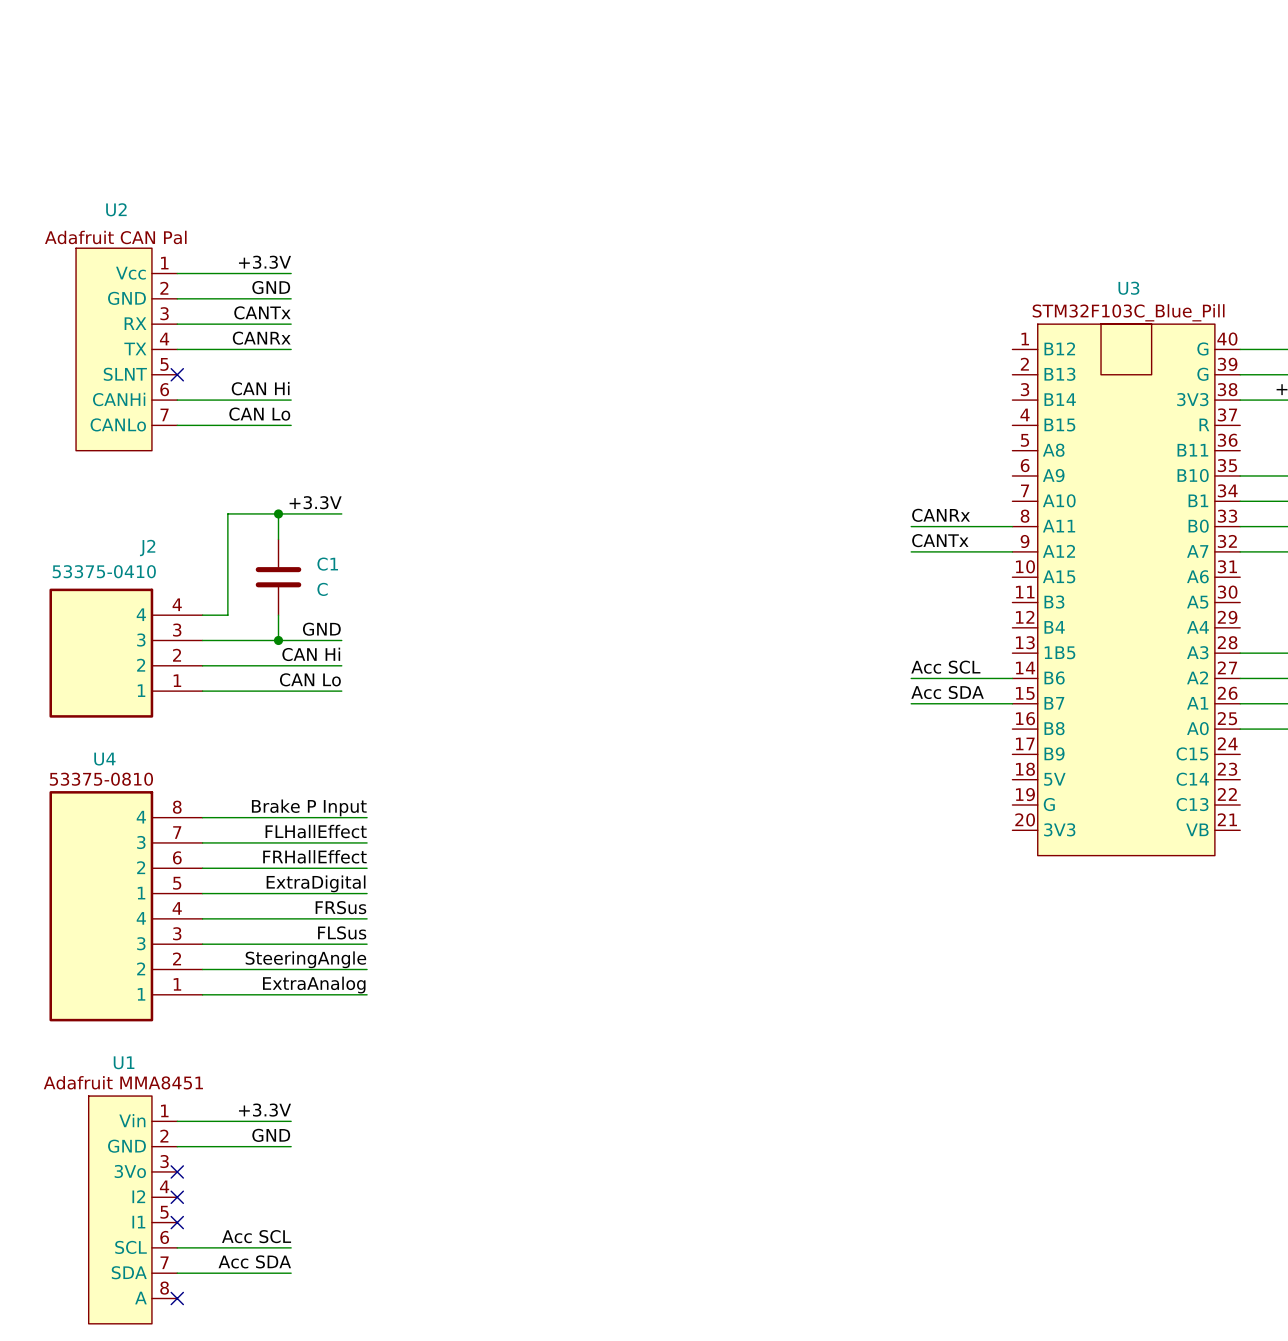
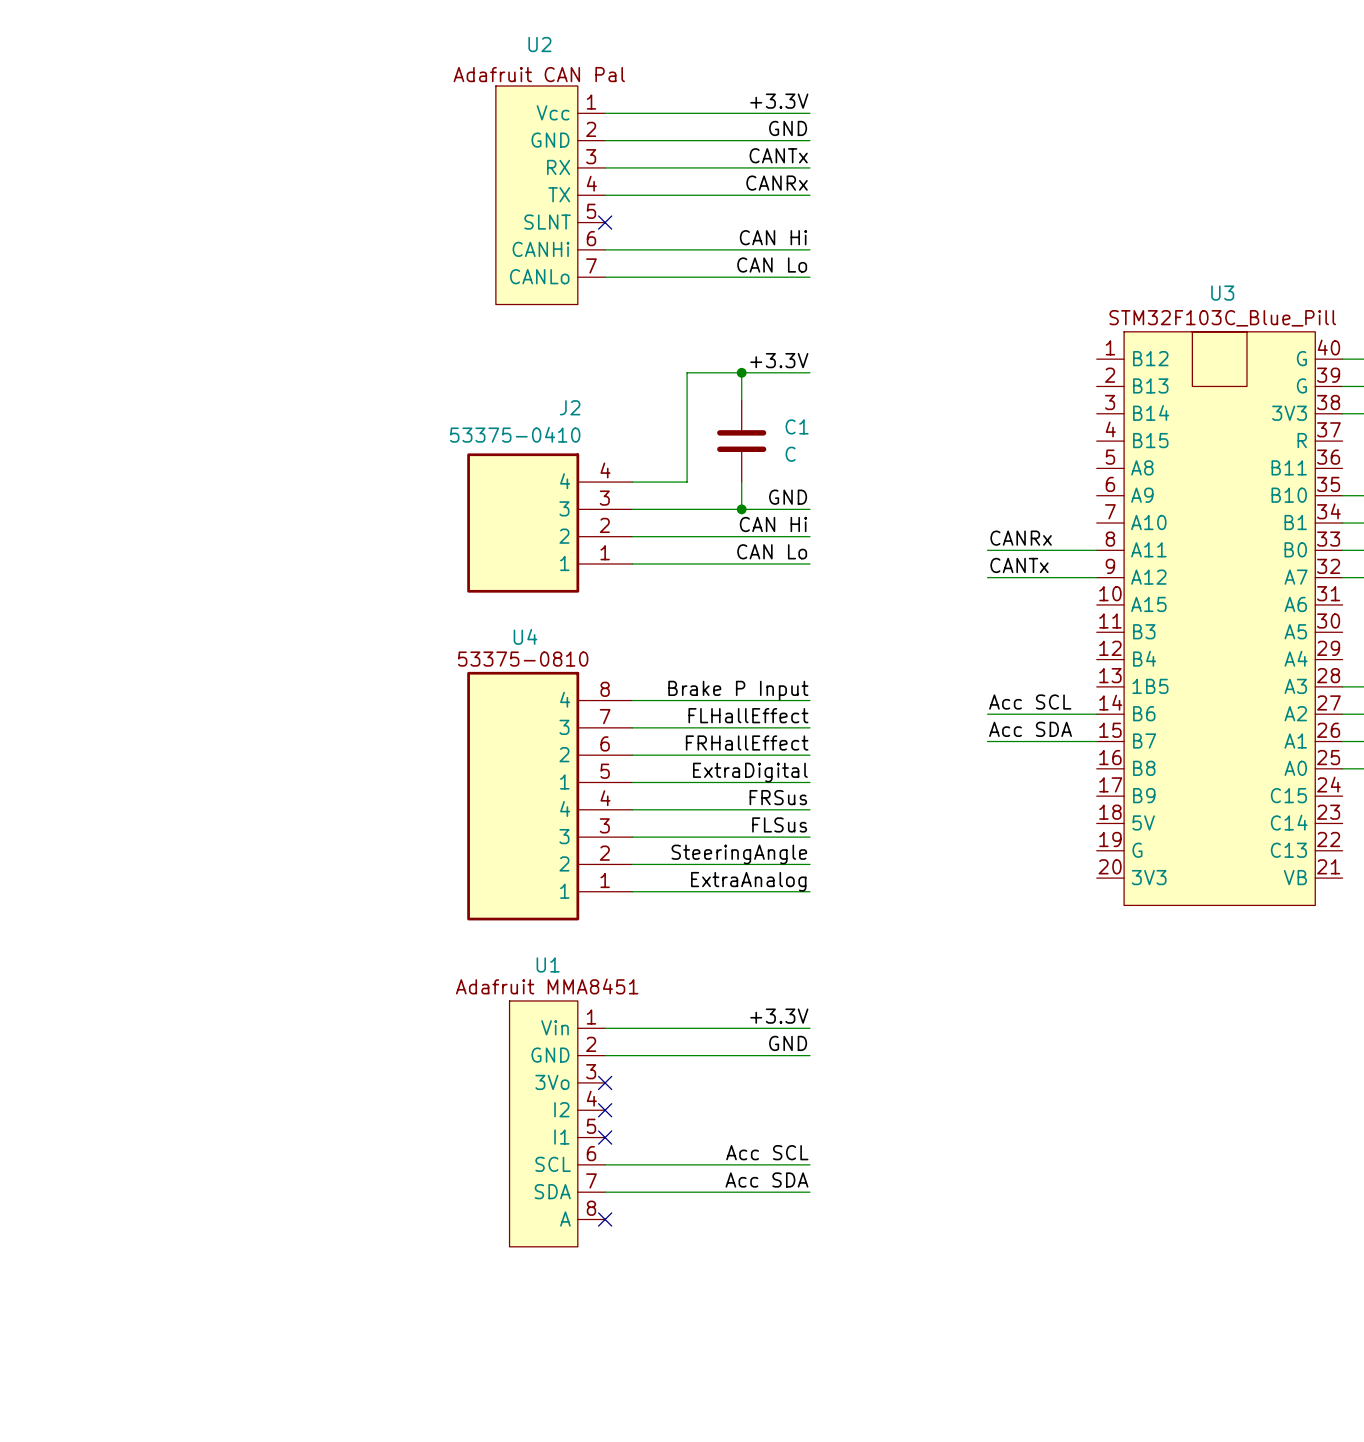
label: none -> +3.3V (779, 101)
wire: none -> (605, 113) (809, 113)
label: none -> GND (788, 128)
wire: none -> (605, 140) (809, 140)
label: none -> CANTx (778, 155)
wire: none -> (605, 167) (809, 167)
label: none -> CANRx (777, 183)
wire: none -> (605, 195) (809, 195)
no-connect mark: none -> (605, 222)
label: none -> CAN Hi (773, 237)
wire: none -> (605, 249) (809, 249)
label: +3.3V (264, 262) -> none
label: none -> CAN Lo (772, 265)
wire: (177, 273) (291, 273) -> none
wire: none -> (605, 277) (809, 277)
label: GND (271, 287) -> none
wire: (177, 298) (291, 298) -> none
label: CANTx (262, 312) -> none
wire: (177, 324) (291, 324) -> none
label: CANRx (261, 338) -> none
U2 position: (126, 349) -> (550, 195)
wire: (177, 349) (291, 349) -> none
label: none -> +3.3V (779, 360)
wire: none -> (741, 372) (741, 400)
junction: none -> (741, 372)
wire: none -> (809, 372) (687, 372) (687, 482) (632, 482)
no-connect mark: (177, 374) -> none
label: CAN Hi (260, 388) -> none
wire: (177, 400) (291, 400) -> none
label: CAN Lo (259, 414) -> none
wire: (177, 425) (291, 425) -> none
wire: none -> (741, 482) (741, 509)
label: none -> GND (788, 497)
wire: none -> (632, 509) (809, 509)
junction: none -> (741, 509)
label: +3.3V (315, 502) -> none
label: none -> CAN Hi (773, 524)
wire: (278, 513) (278, 539) -> none
junction: (278, 513) -> none
wire: (341, 513) (227, 513) (227, 615) (202, 615) -> none
wire: none -> (632, 536) (809, 536)
label: none -> CAN Lo (772, 551)
wire: none -> (632, 563) (809, 563)
C1 position: (278, 577) -> (741, 441)
wire: (278, 615) (278, 640) -> none
label: GND (321, 629) -> none
wire: (202, 640) (341, 640) -> none
junction: (278, 640) -> none
J2 position: (126, 653) -> (549, 523)
label: CAN Hi (311, 654) -> none
label: none -> Brake P Input (738, 690)
wire: (202, 665) (341, 665) -> none
wire: none -> (632, 700) (809, 700)
label: CAN Lo (310, 679) -> none
label: none -> FLHallEffect (748, 715)
wire: (202, 691) (341, 691) -> none
wire: none -> (632, 727) (809, 727)
label: none -> FRHallEffect (747, 742)
wire: none -> (632, 755) (809, 755)
label: none -> ExtraDigital (750, 772)
wire: none -> (632, 782) (809, 782)
label: none -> FRSus (778, 797)
wire: none -> (632, 809) (809, 809)
label: none -> FLSus (779, 824)
wire: none -> (632, 837) (809, 837)
label: Brake P Input (309, 807) -> none
label: none -> SteeringAngle (739, 854)
wire: (202, 817) (367, 817) -> none
wire: none -> (632, 864) (809, 864)
label: FLHallEffect (316, 831) -> none
label: none -> ExtraAnalog (748, 881)
wire: (202, 842) (367, 842) -> none
wire: none -> (632, 891) (809, 891)
label: FRHallEffect (314, 856) -> none
wire: (202, 868) (367, 868) -> none
label: ExtraDigital (316, 883) -> none
wire: (202, 893) (367, 893) -> none
U4 position: (126, 906) -> (549, 796)
label: FRSus (340, 907) -> none
wire: (202, 918) (367, 918) -> none
label: FLSus (342, 932) -> none
wire: (202, 944) (367, 944) -> none
label: none -> +3.3V (779, 1016)
label: SteeringAngle (305, 959) -> none
wire: (202, 969) (367, 969) -> none
wire: none -> (605, 1028) (809, 1028)
label: none -> GND (788, 1043)
label: ExtraAnalog (314, 985) -> none
wire: (202, 994) (367, 994) -> none
wire: none -> (605, 1055) (809, 1055)
no-connect mark: none -> (605, 1082)
no-connect mark: none -> (605, 1110)
no-connect mark: none -> (605, 1137)
label: none -> Acc SCL (767, 1152)
wire: none -> (605, 1164) (809, 1164)
label: +3.3V (264, 1110) -> none
label: none -> Acc SDA (766, 1179)
wire: (177, 1121) (291, 1121) -> none
wire: none -> (605, 1192) (809, 1192)
label: GND (271, 1135) -> none
wire: (177, 1146) (291, 1146) -> none
no-connect mark: none -> (605, 1219)
no-connect mark: (177, 1171) -> none
no-connect mark: (177, 1197) -> none
U1 position: (132, 1209) -> (557, 1123)
no-connect mark: (177, 1222) -> none
label: Acc SCL (256, 1236) -> none
wire: (177, 1247) (291, 1247) -> none
label: Acc SDA (254, 1261) -> none
wire: (177, 1273) (291, 1273) -> none
no-connect mark: (177, 1298) -> none

